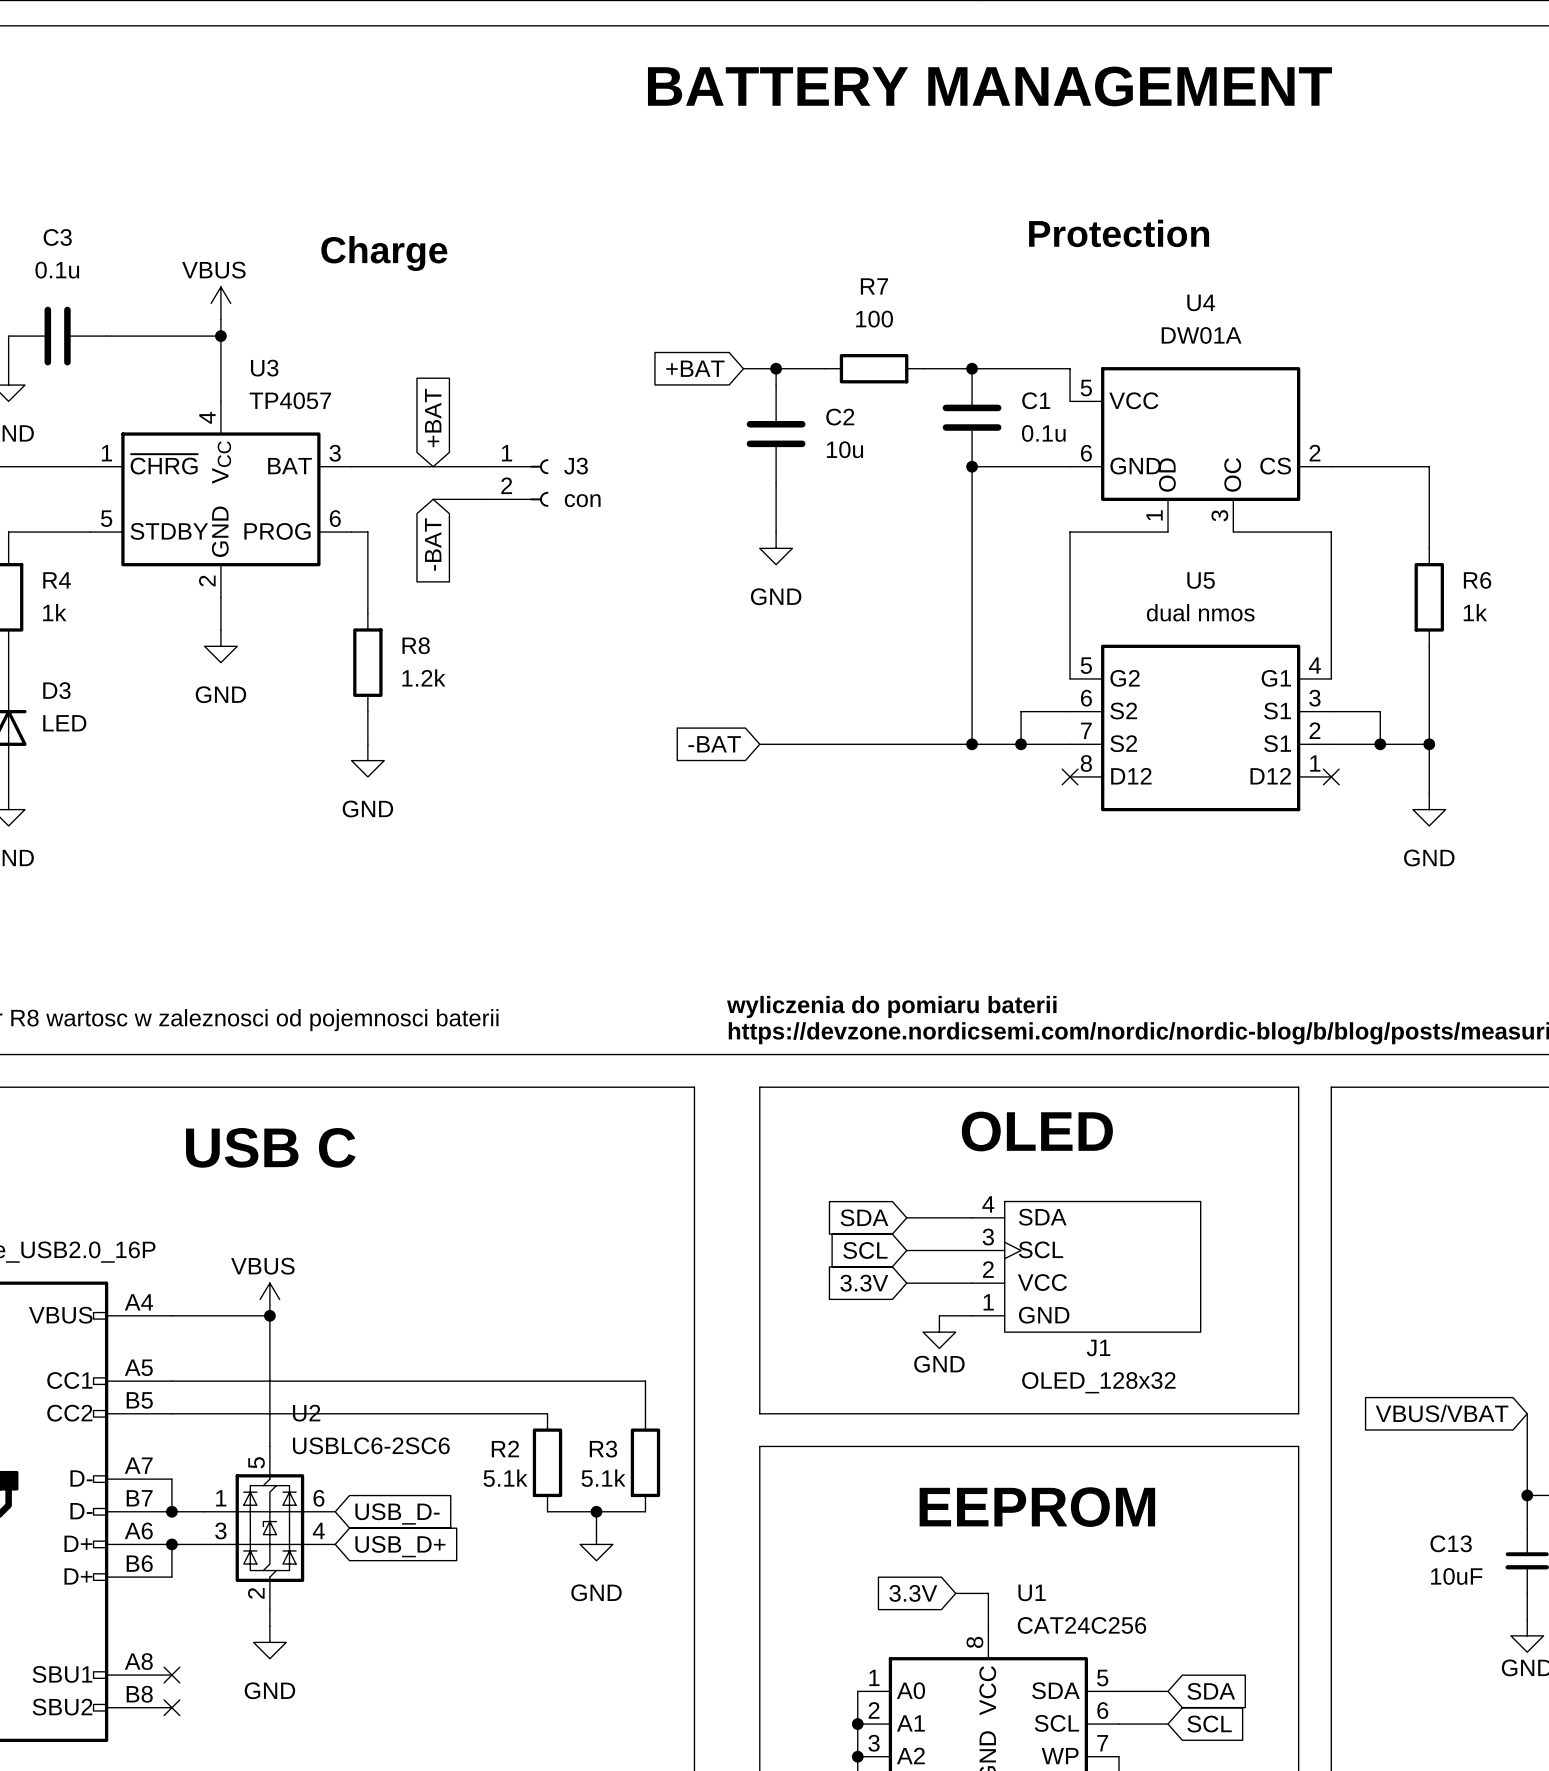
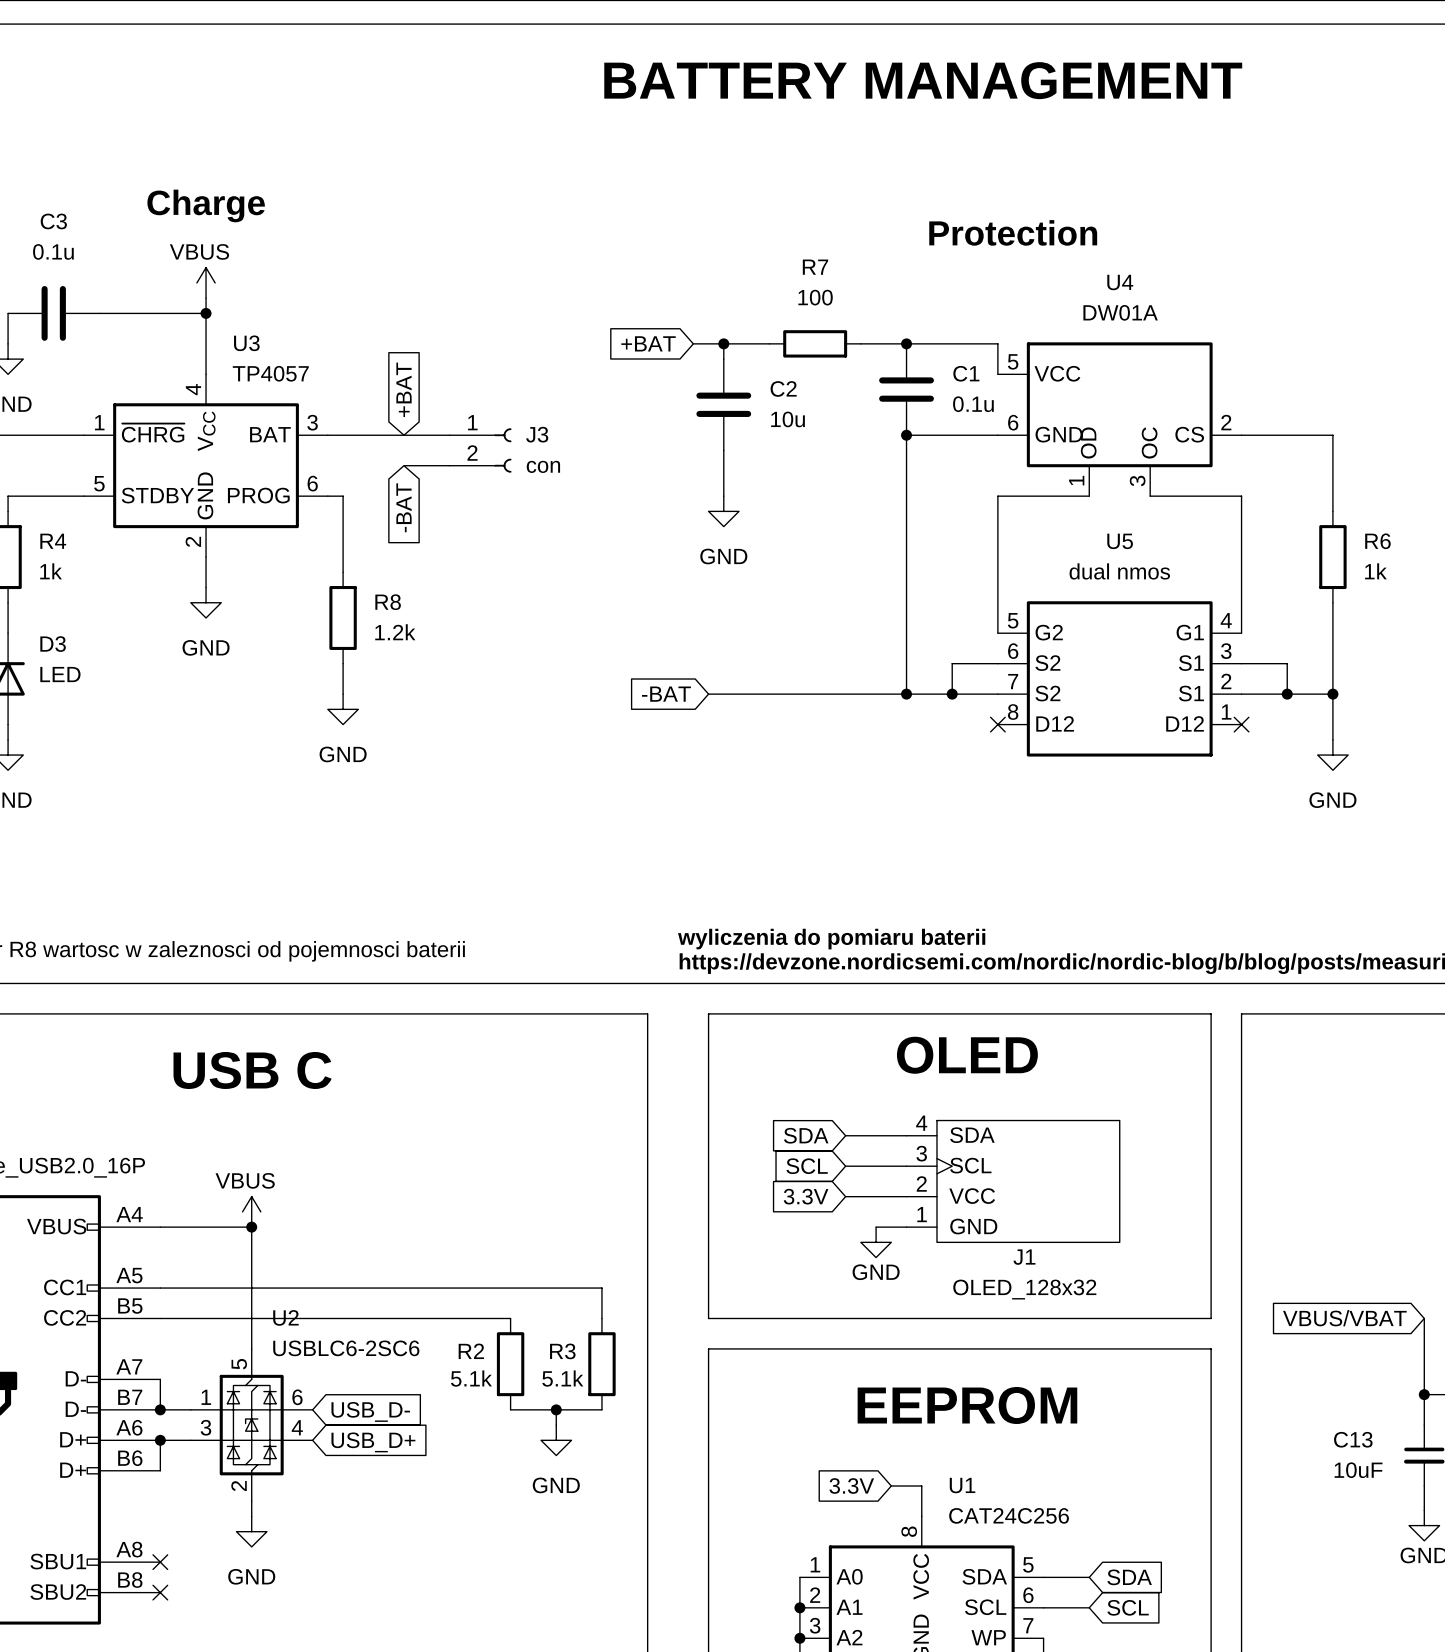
text position: Protection (1119, 233) -> Protection (1013, 232)
text position: Charge (384, 253) -> Charge (206, 205)

